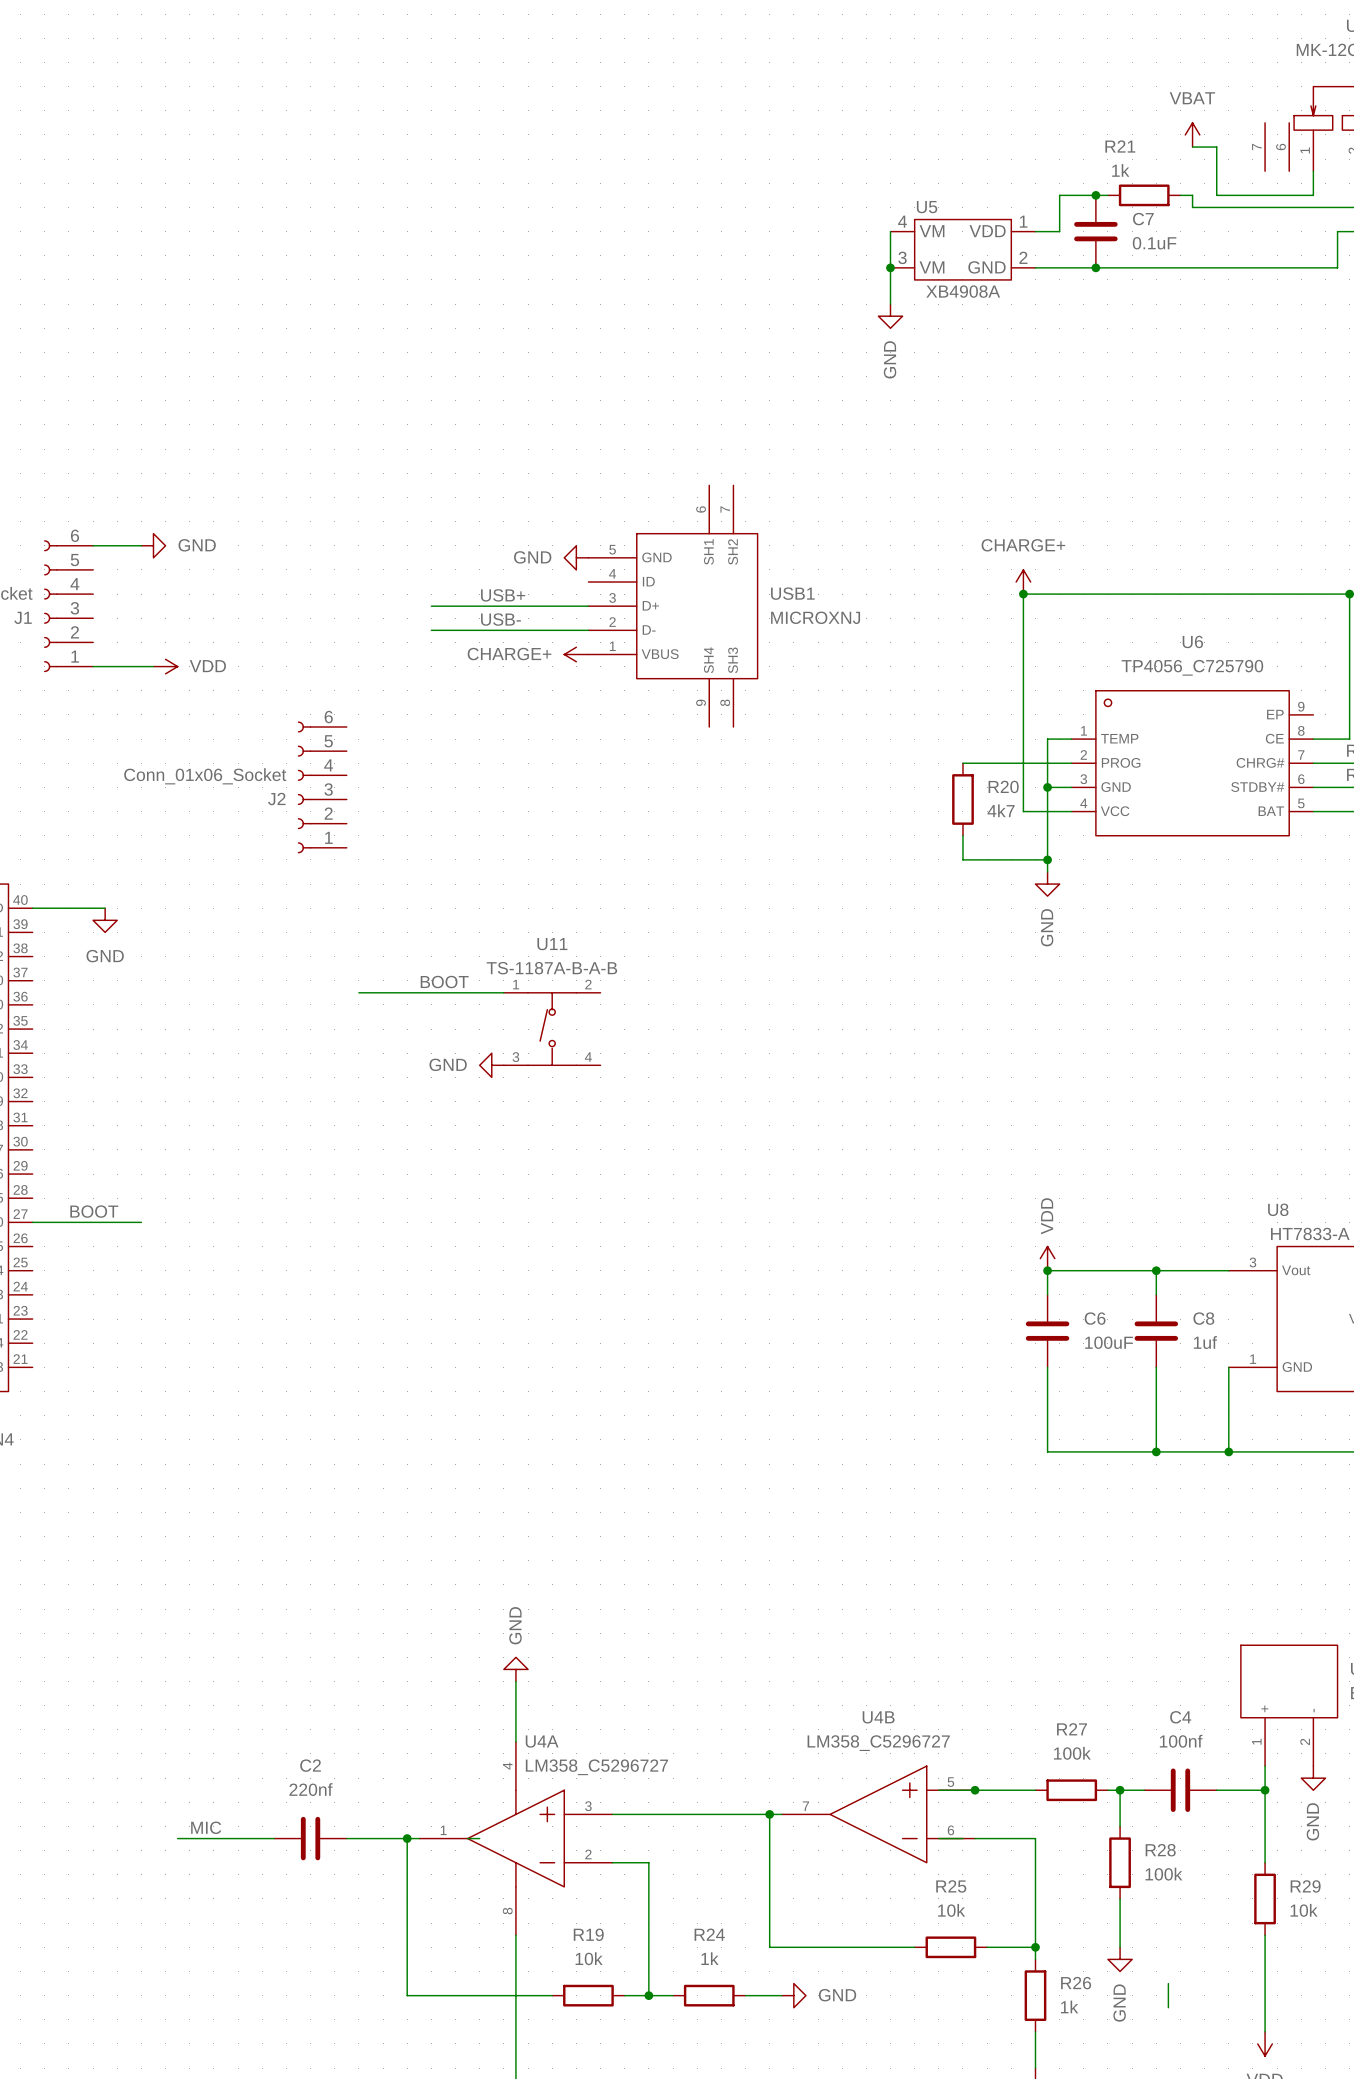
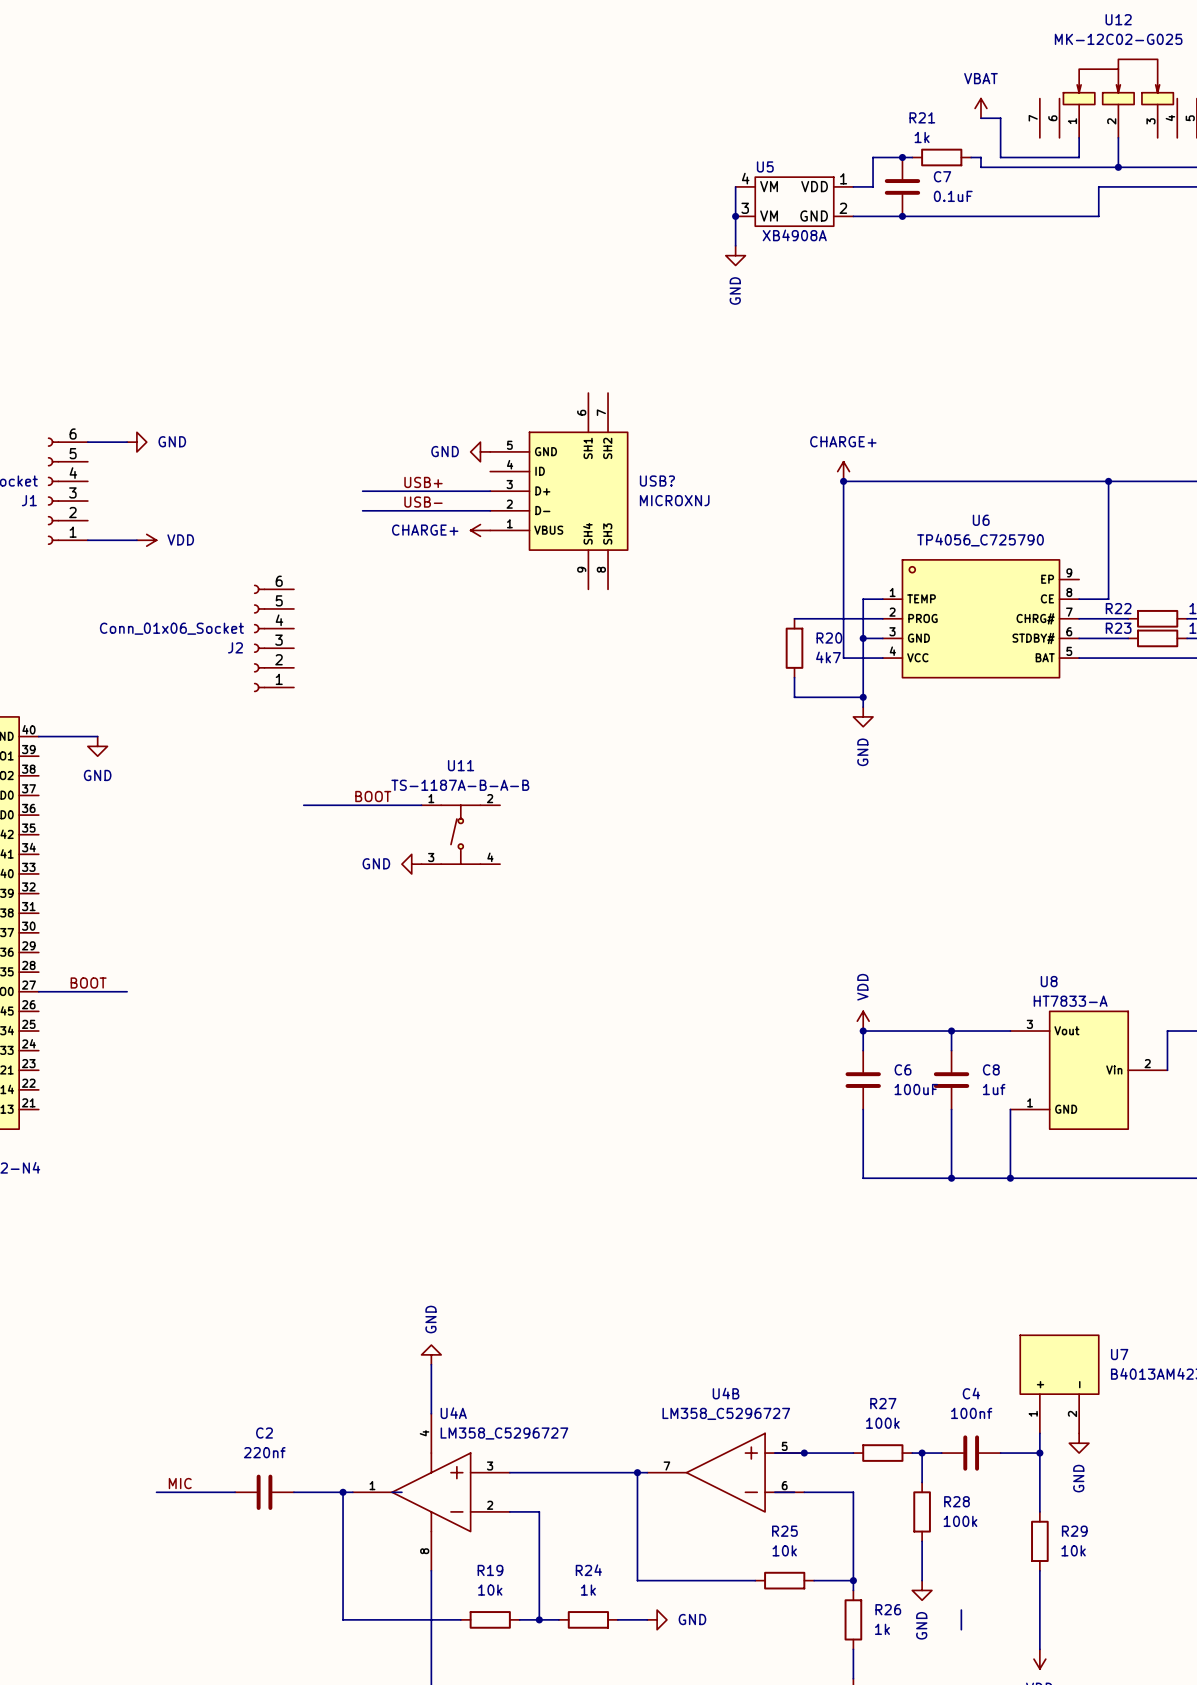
USB1 name: USB1 (792, 593) -> USB? (657, 481)

